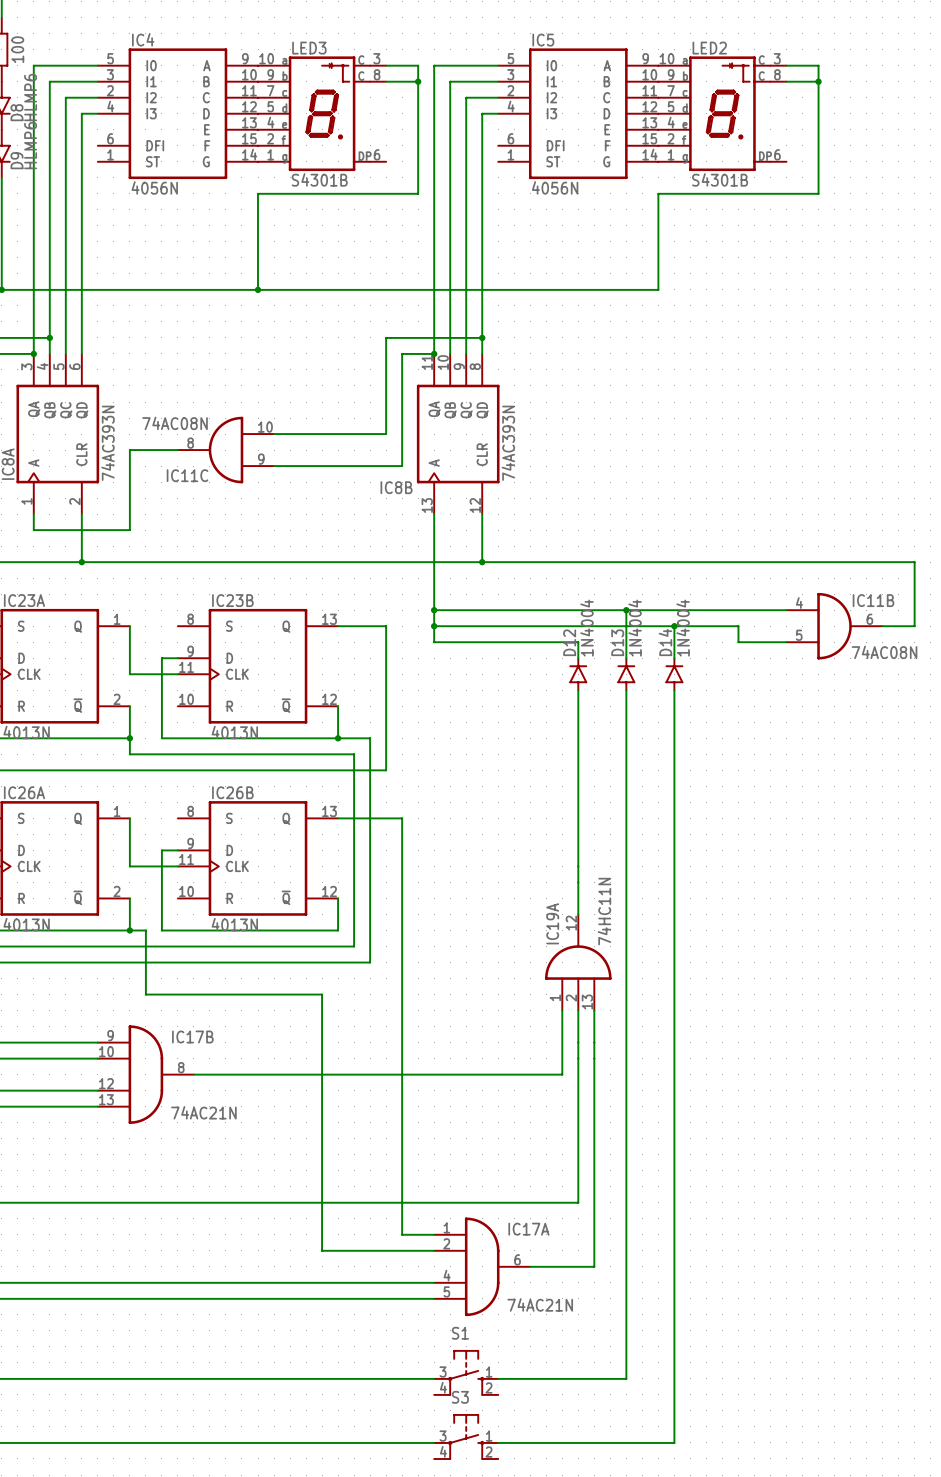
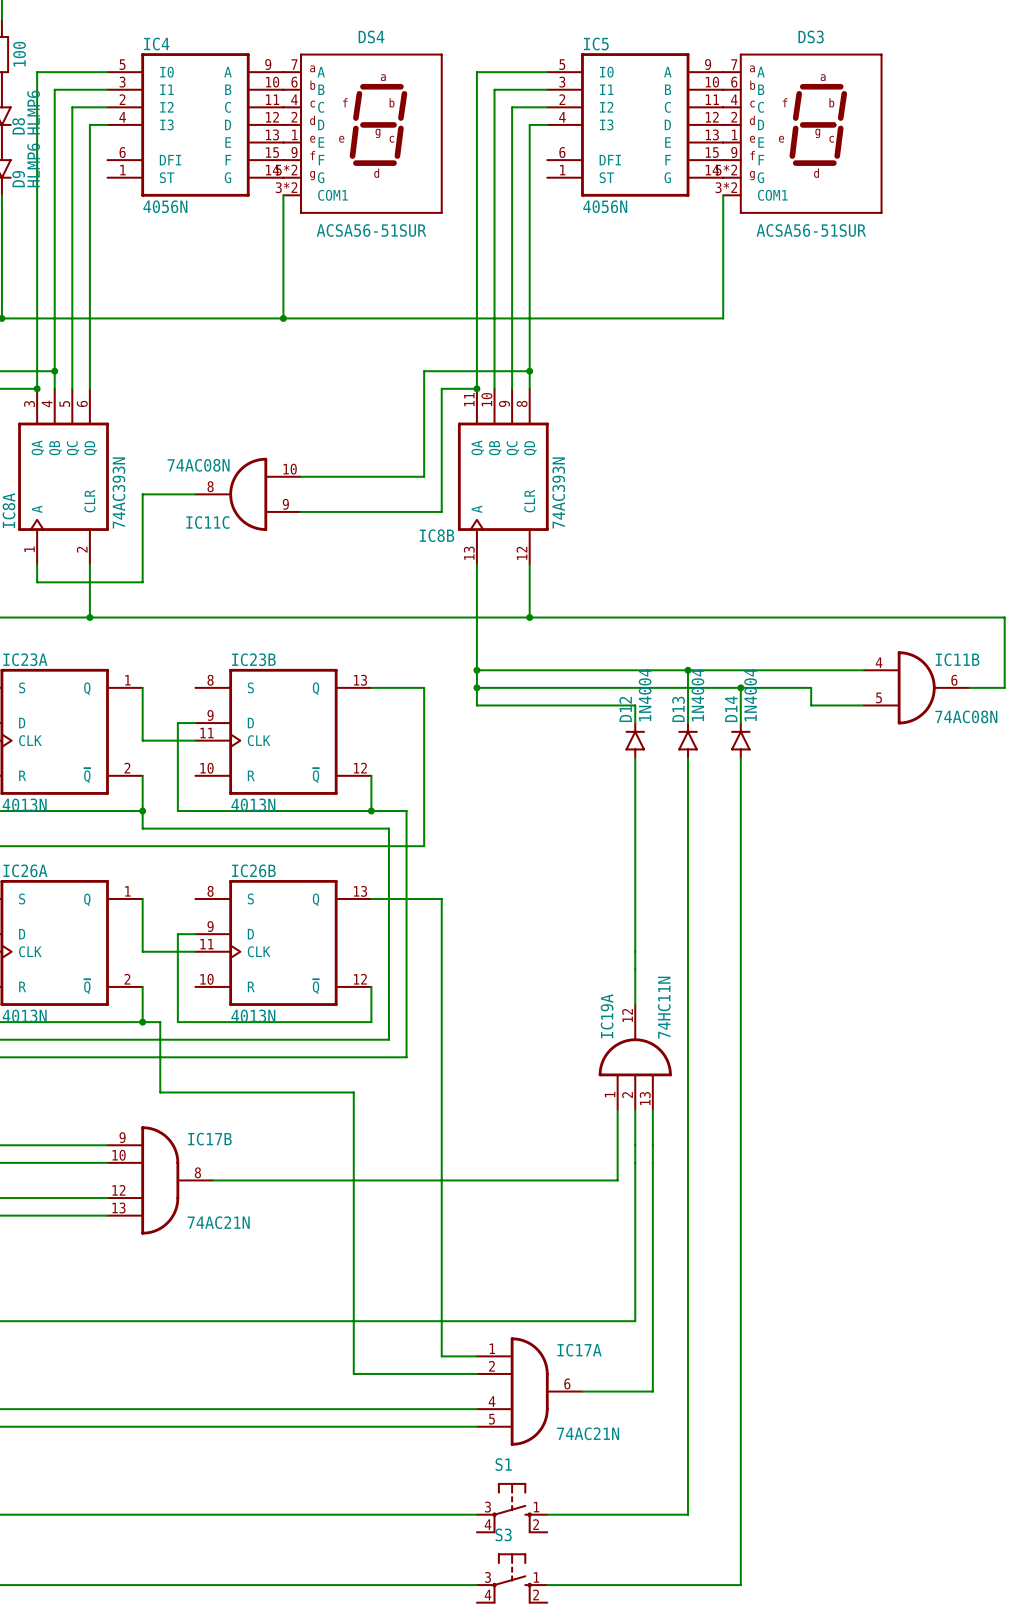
wire: (386, 65) (418, 65) (418, 193) (258, 193) -> (283, 195) (283, 212)
wire: (786, 65) (818, 65) (818, 193) (658, 193) -> (723, 195) (723, 212)
wire: (386, 81) (418, 81) -> none
junction: (418, 81) -> none
wire: (786, 81) (818, 81) -> none
junction: (818, 81) -> none
LED3: S4301B (322, 113) -> none
LED2: S4301B (722, 113) -> none
DS4: none -> ACSA56-51SUR (363, 133)
DS3: none -> ACSA56-51SUR (802, 133)

